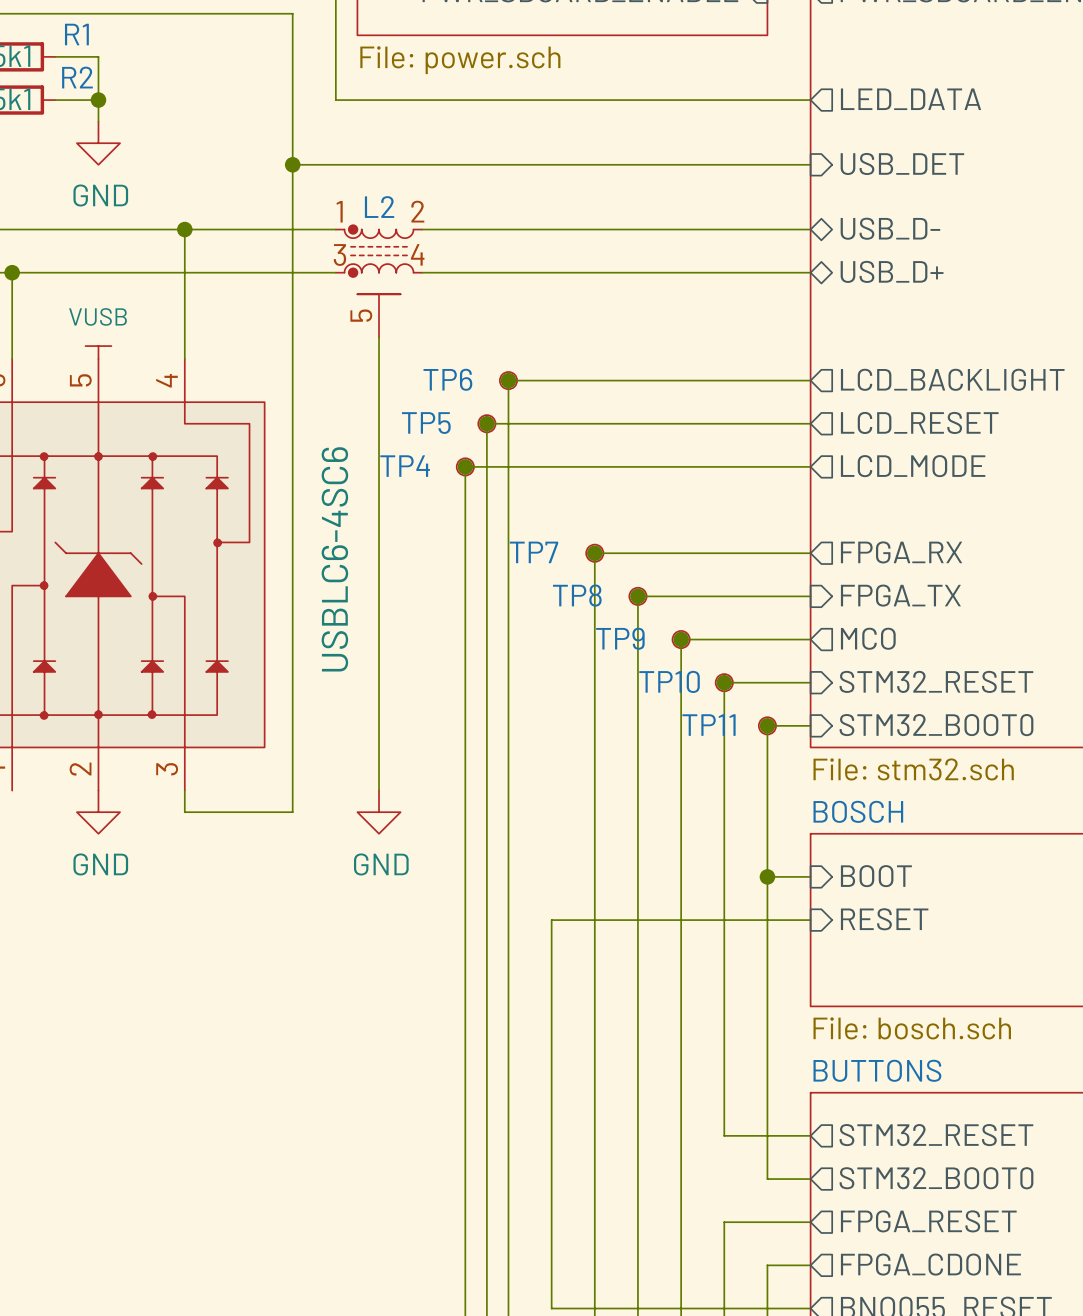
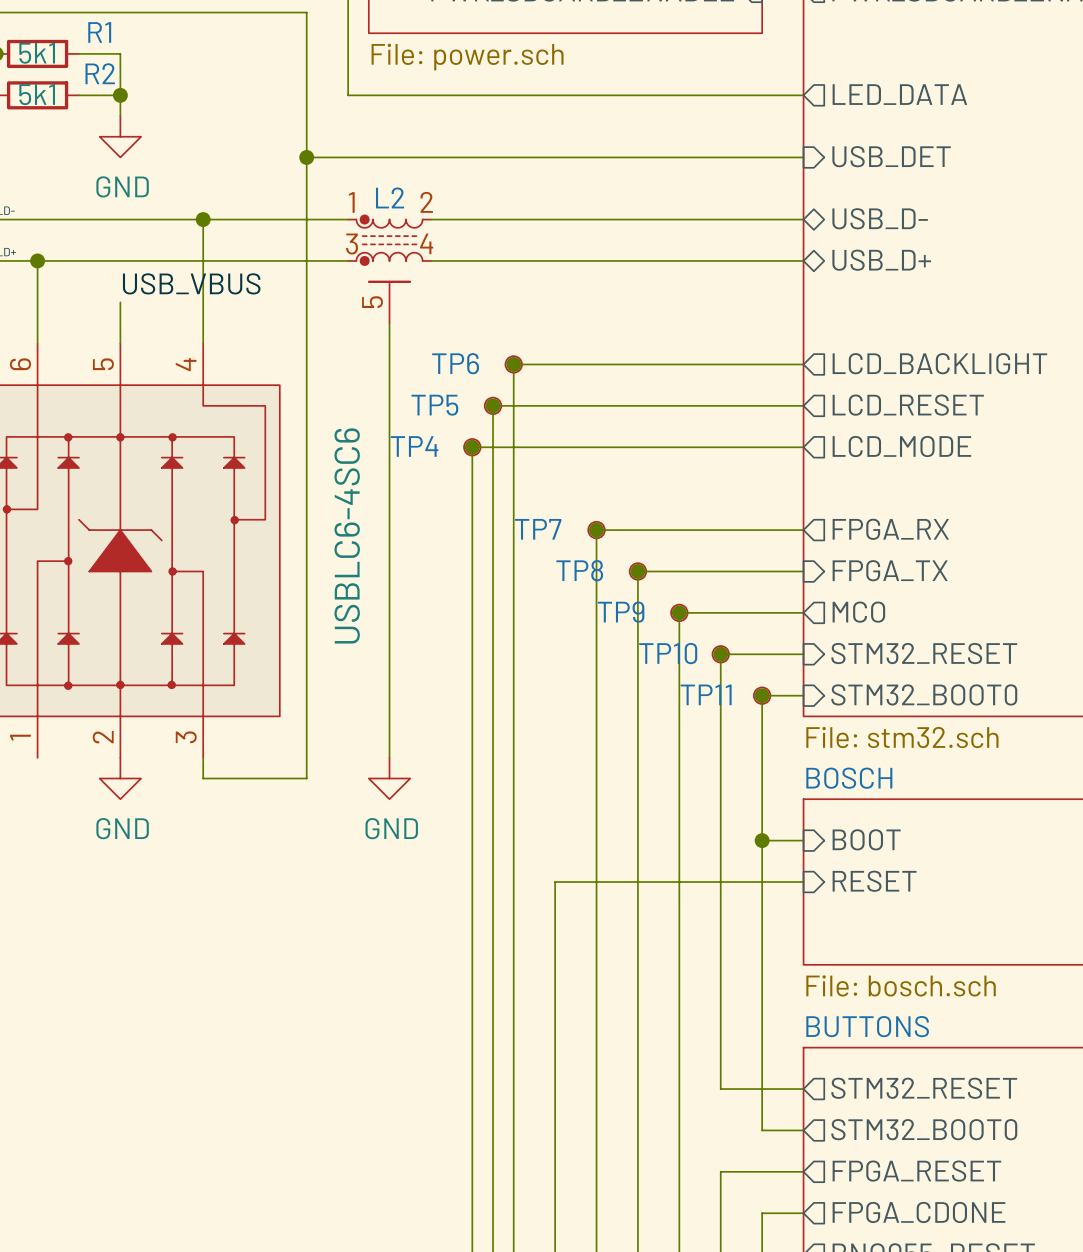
label: none -> USB_VBUS (191, 283)
wire: none -> (120, 302) (120, 343)
power symbol: VUSB (98, 352) -> none

